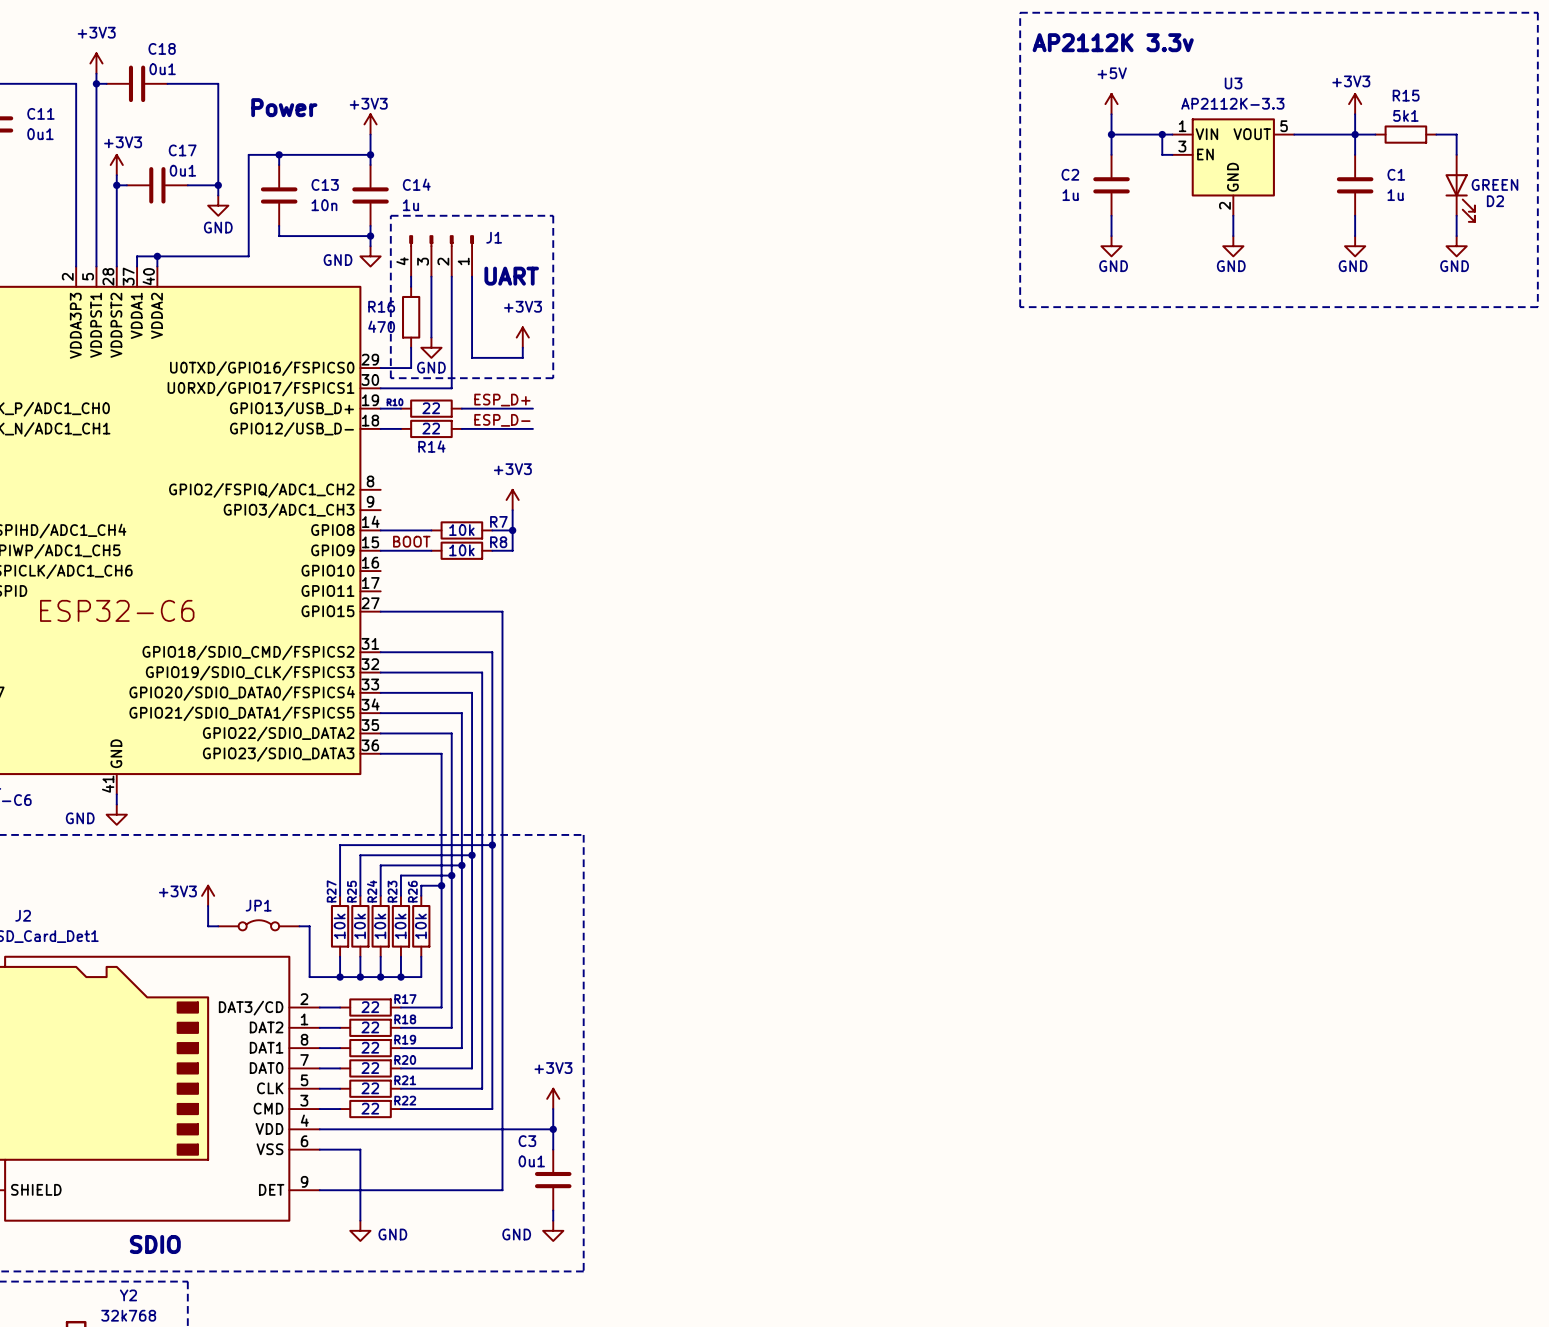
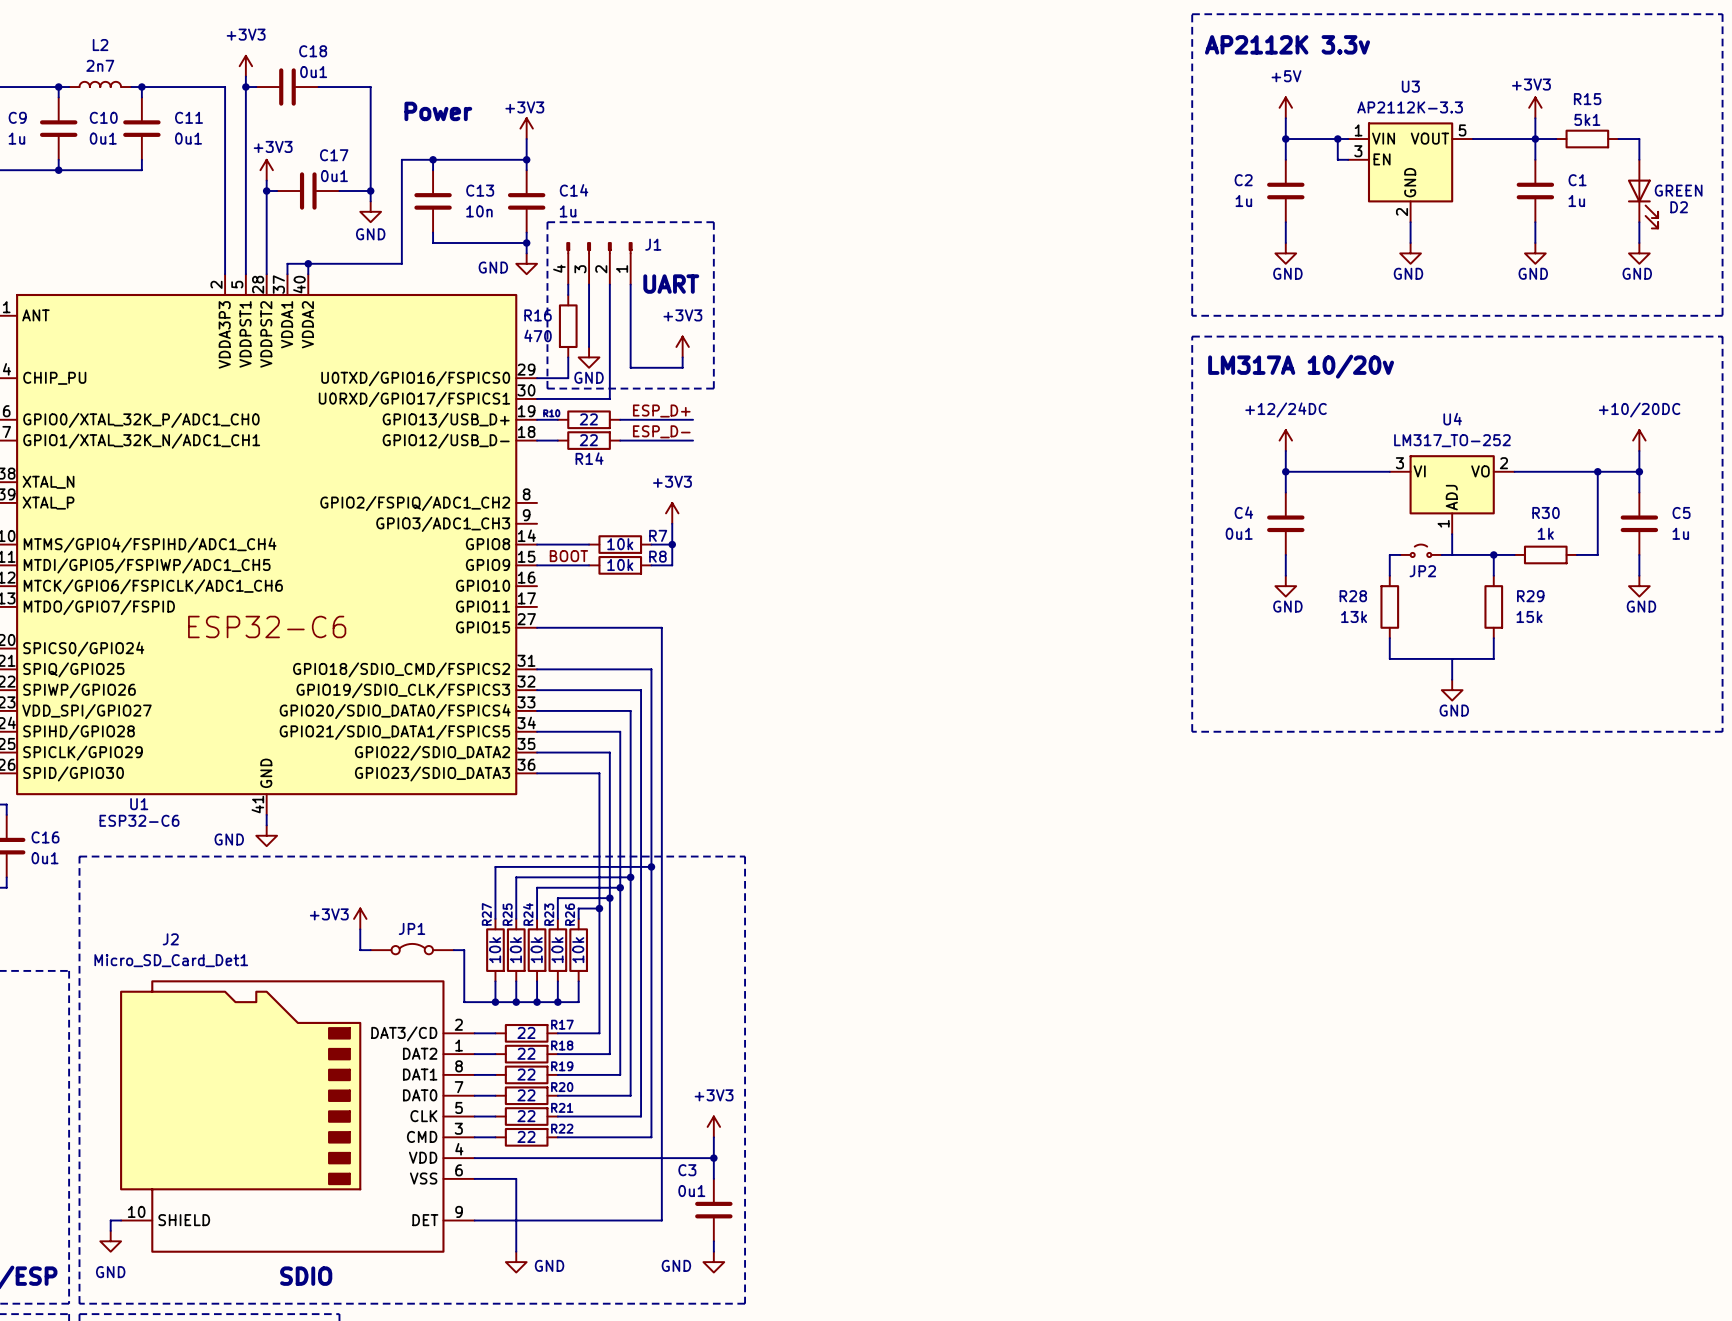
line: none -> (1192, 336) (1722, 336) (1722, 731) (1192, 731) (1192, 336)
text: none -> LM317A 10/20v (1301, 366)
power symbol: none -> +12/24DC (1285, 440)
power symbol: none -> +10/20DC (1639, 440)
wire: none -> (1285, 450) (1285, 492)
wire: none -> (1639, 450) (1639, 492)
wire: none -> (1285, 471) (1389, 471)
junction: none -> (1285, 471)
wire: none -> (1514, 471) (1639, 471)
wire: none -> (1597, 471) (1597, 554) (1576, 554)
junction: none -> (1597, 471)
junction: none -> (1639, 471)
U4: none -> LM317_TO-252 (1452, 494)
C4: none -> 0u1 (1285, 523)
C5: none -> 1u (1639, 523)
wire: none -> (1452, 534) (1452, 554)
JP2: none -> (1420, 550)
wire: none -> (1285, 554) (1285, 575)
wire: none -> (1400, 554) (1389, 554) (1389, 575)
wire: none -> (1441, 554) (1514, 554)
wire: none -> (1493, 554) (1493, 575)
junction: none -> (1493, 554)
R30: none -> 1k (1545, 554)
wire: none -> (1639, 554) (1639, 575)
power symbol: none -> GND (1285, 586)
power symbol: none -> GND (1639, 586)
R28: none -> 13k (1389, 606)
R29: none -> 15k (1493, 606)
wire: none -> (1389, 638) (1389, 658) (1493, 658) (1493, 638)
wire: none -> (1452, 658) (1452, 679)
power symbol: none -> GND (1452, 690)

